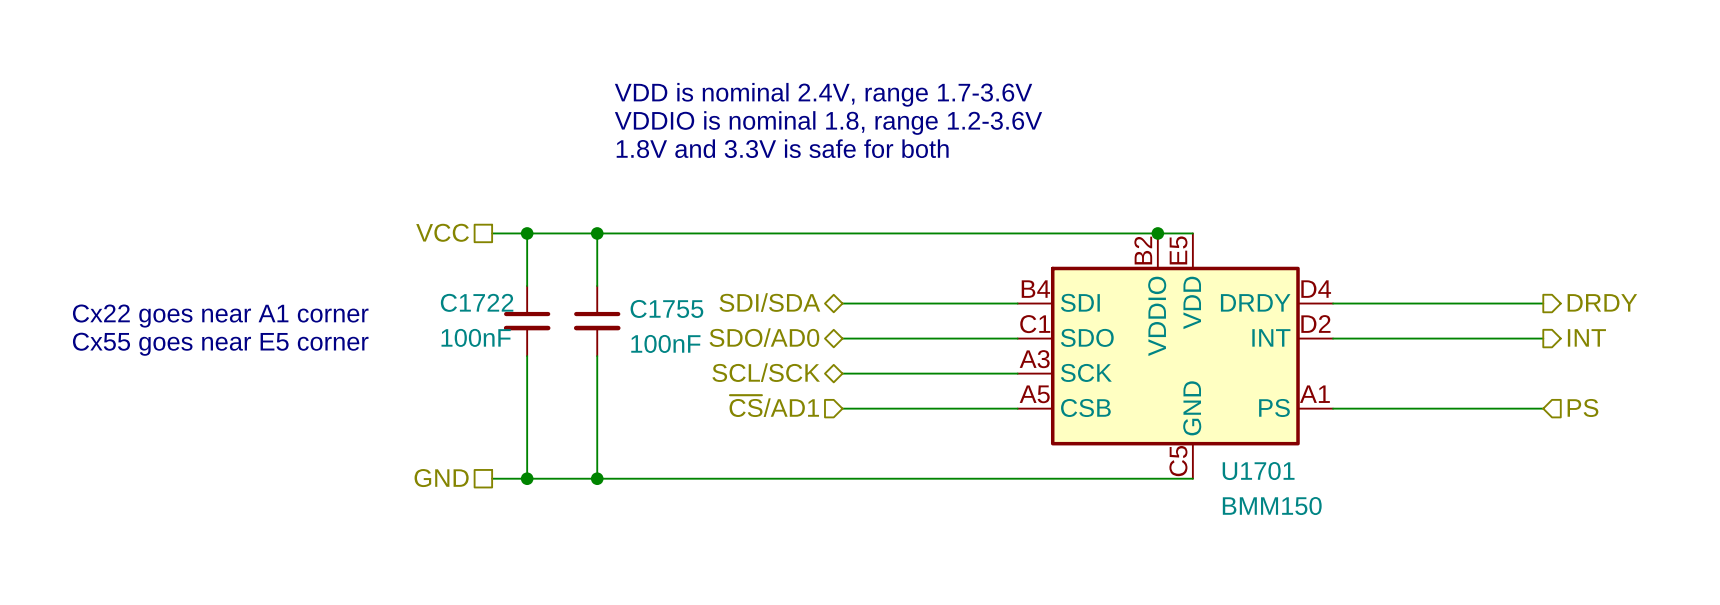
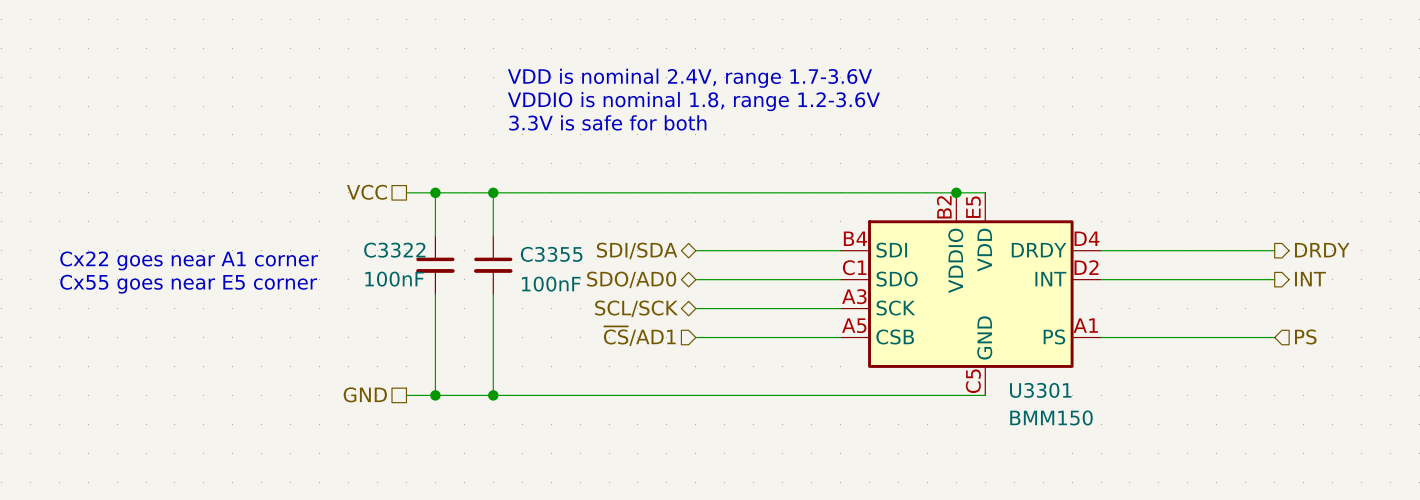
text: 1.8V and 3.3V is safe for both (782, 148) -> 3.3V is safe for both (607, 122)
C1722 name: C1722 (477, 302) -> C3322 (394, 250)
C1755 name: C1755 (666, 308) -> C3355 (551, 254)
U1701 name: U1701 (1258, 471) -> U3301 (1040, 390)

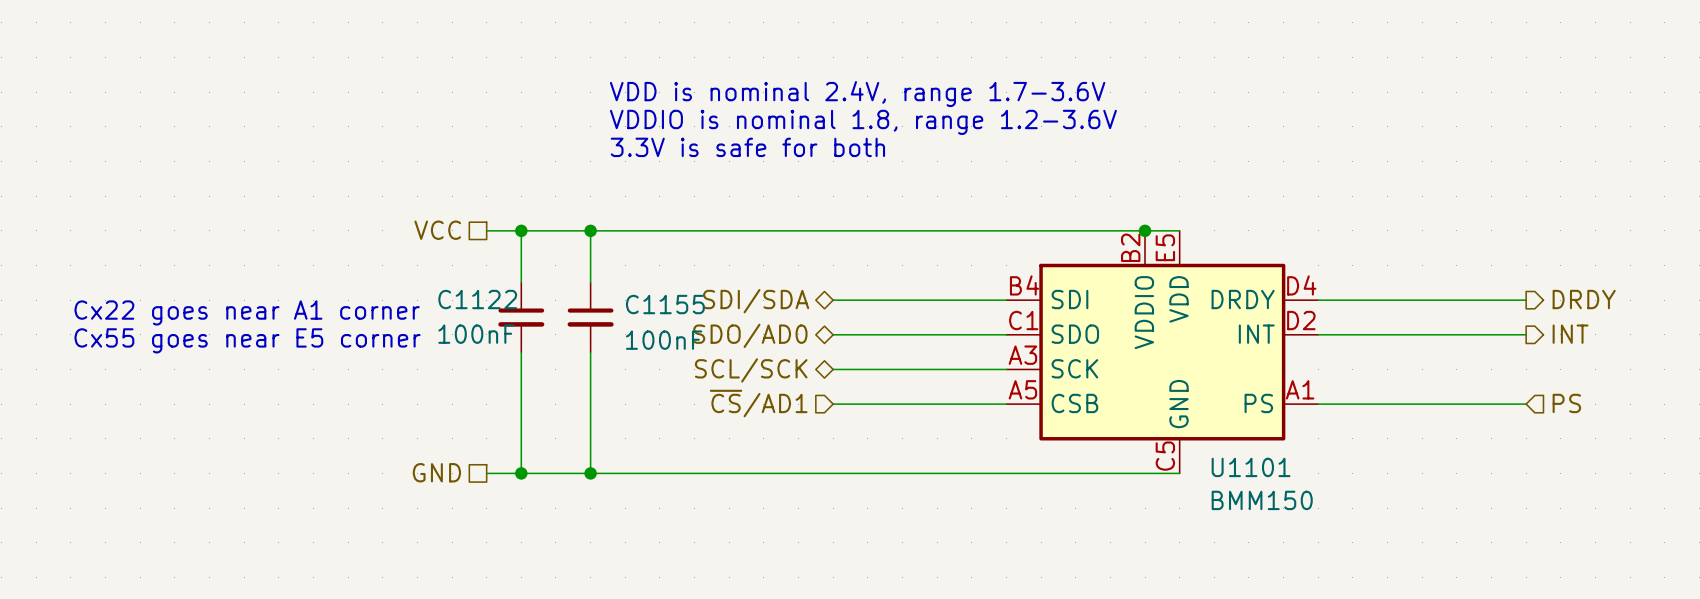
C3322 name: C3322 (394, 250) -> C1122 (477, 299)
C3355 name: C3355 (551, 254) -> C1155 (665, 304)
U3301 name: U3301 (1040, 390) -> U1101 (1251, 467)

